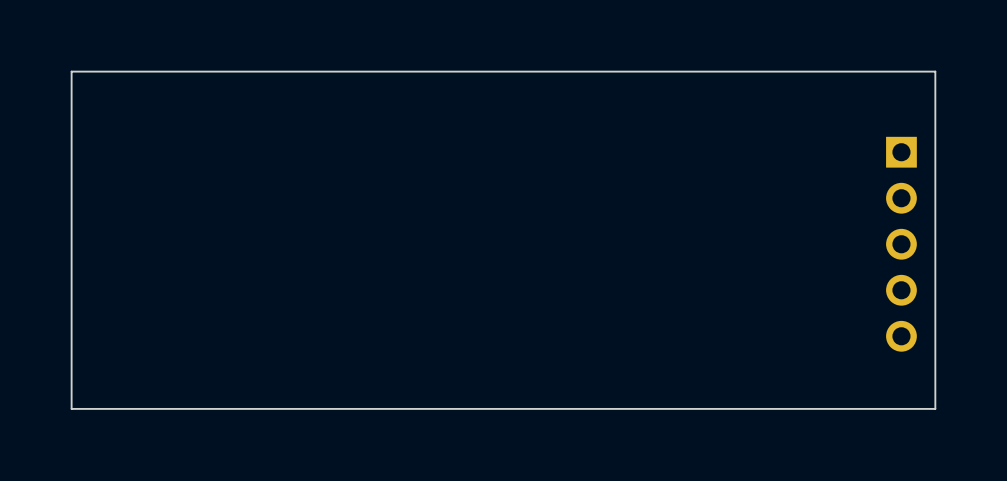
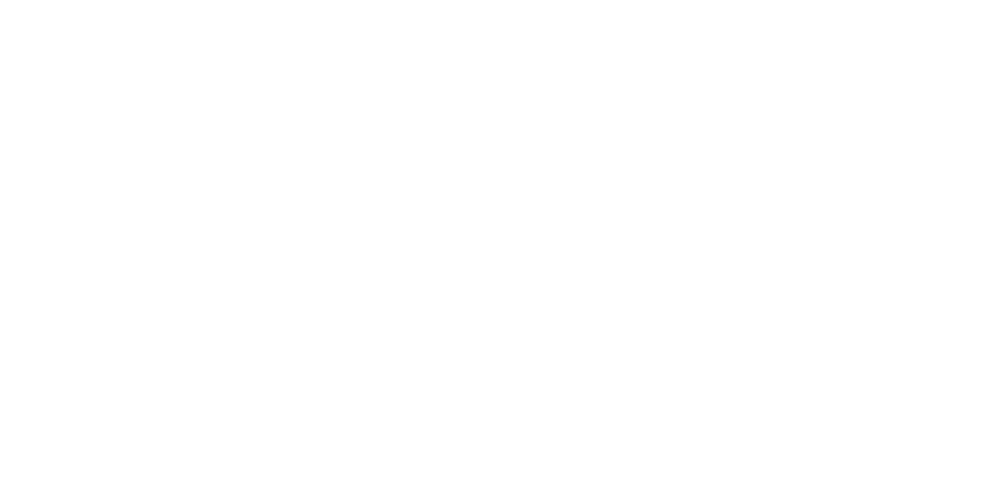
board edge: (935, 71) (71, 71) (71, 408) (935, 408) (935, 71) -> none
part: (901, 244) -> none

